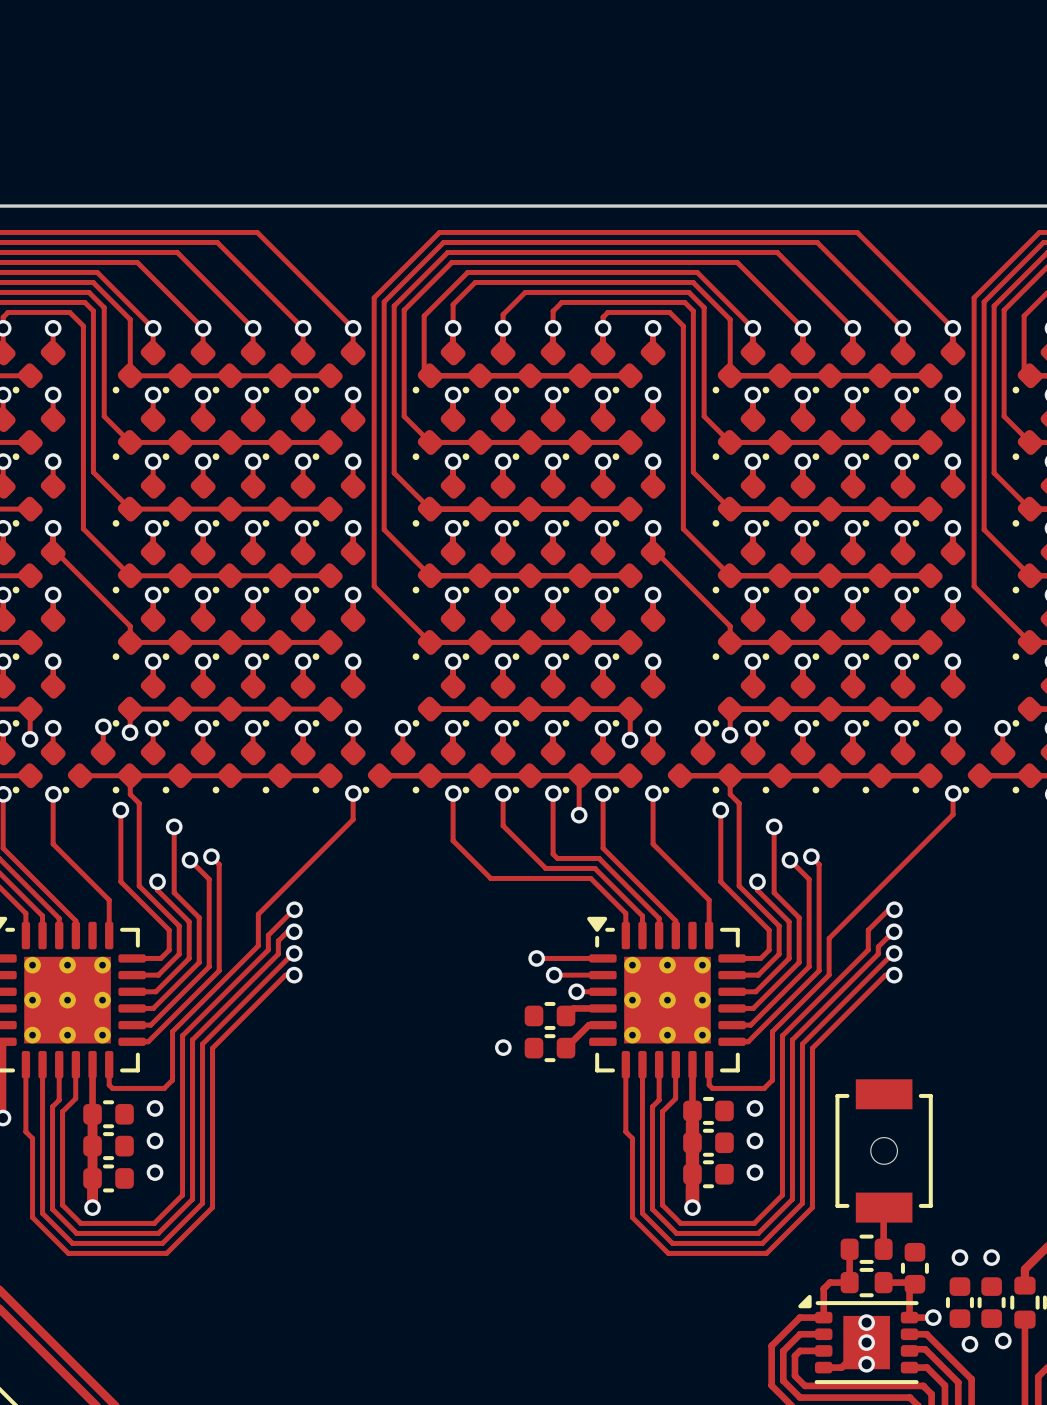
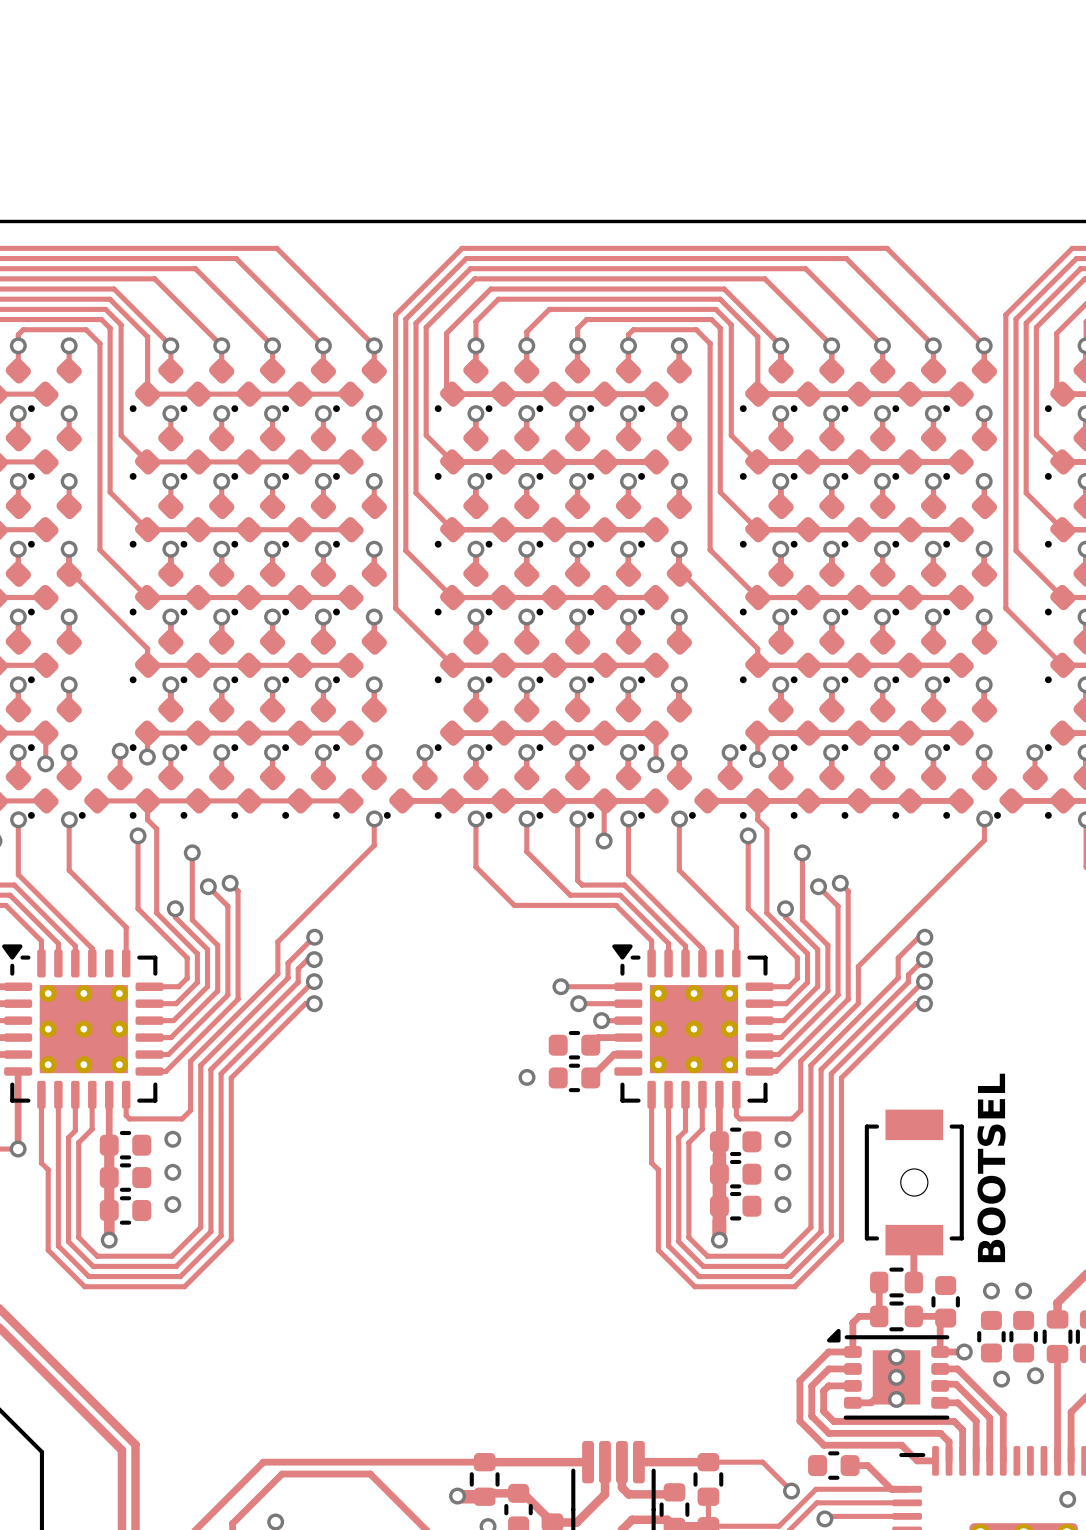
text: none -> BOOTSEL (991, 1167)

